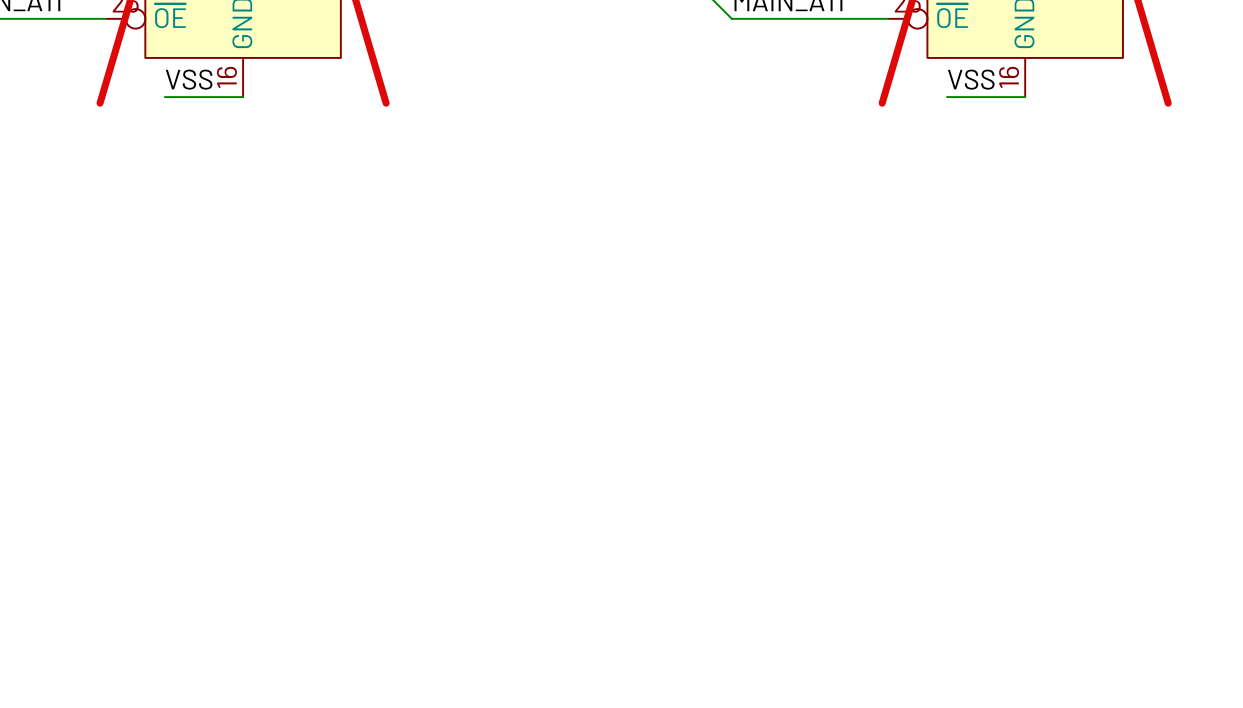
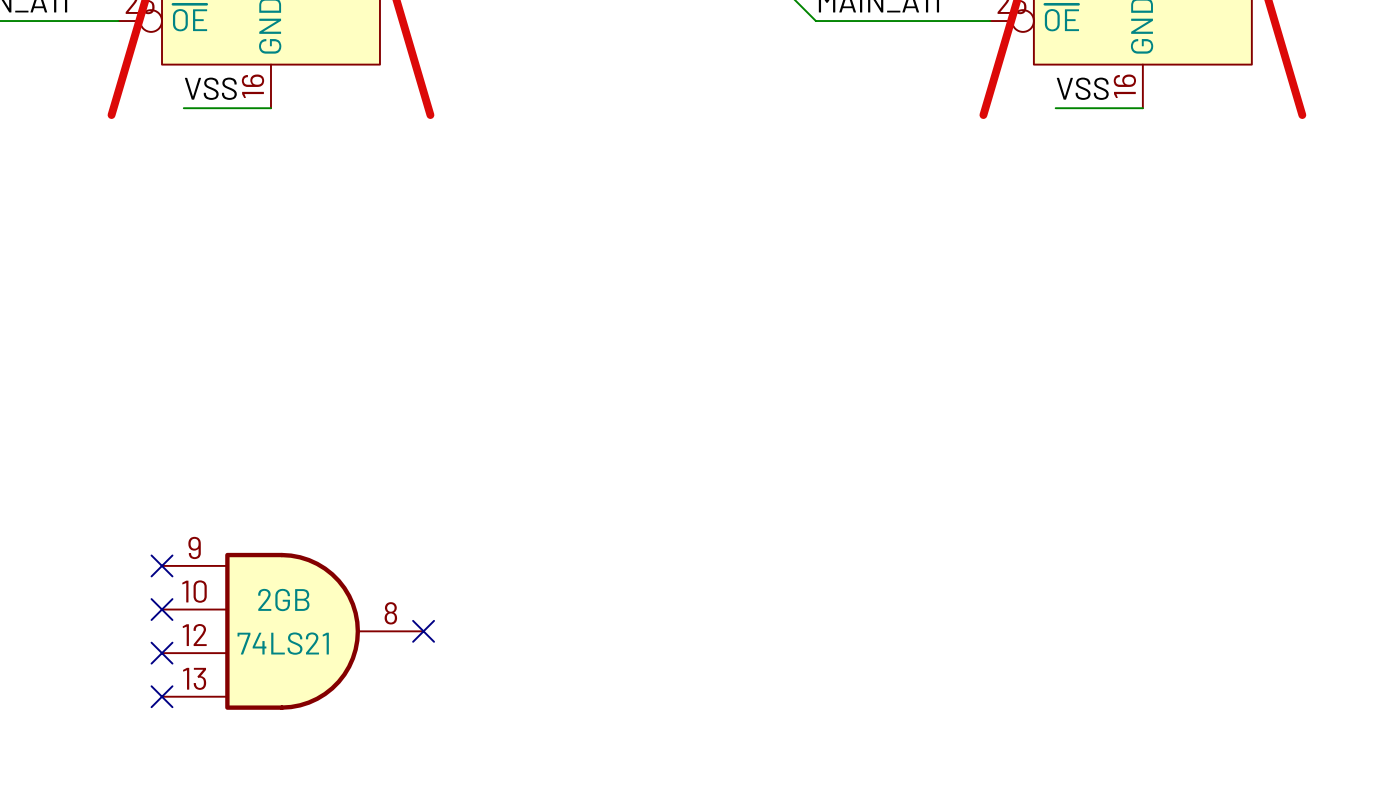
no-connect mark: none -> (162, 565)
no-connect mark: none -> (162, 609)
2GB: none -> 74LS21 (292, 631)
no-connect mark: none -> (423, 631)
no-connect mark: none -> (162, 653)
no-connect mark: none -> (162, 696)

